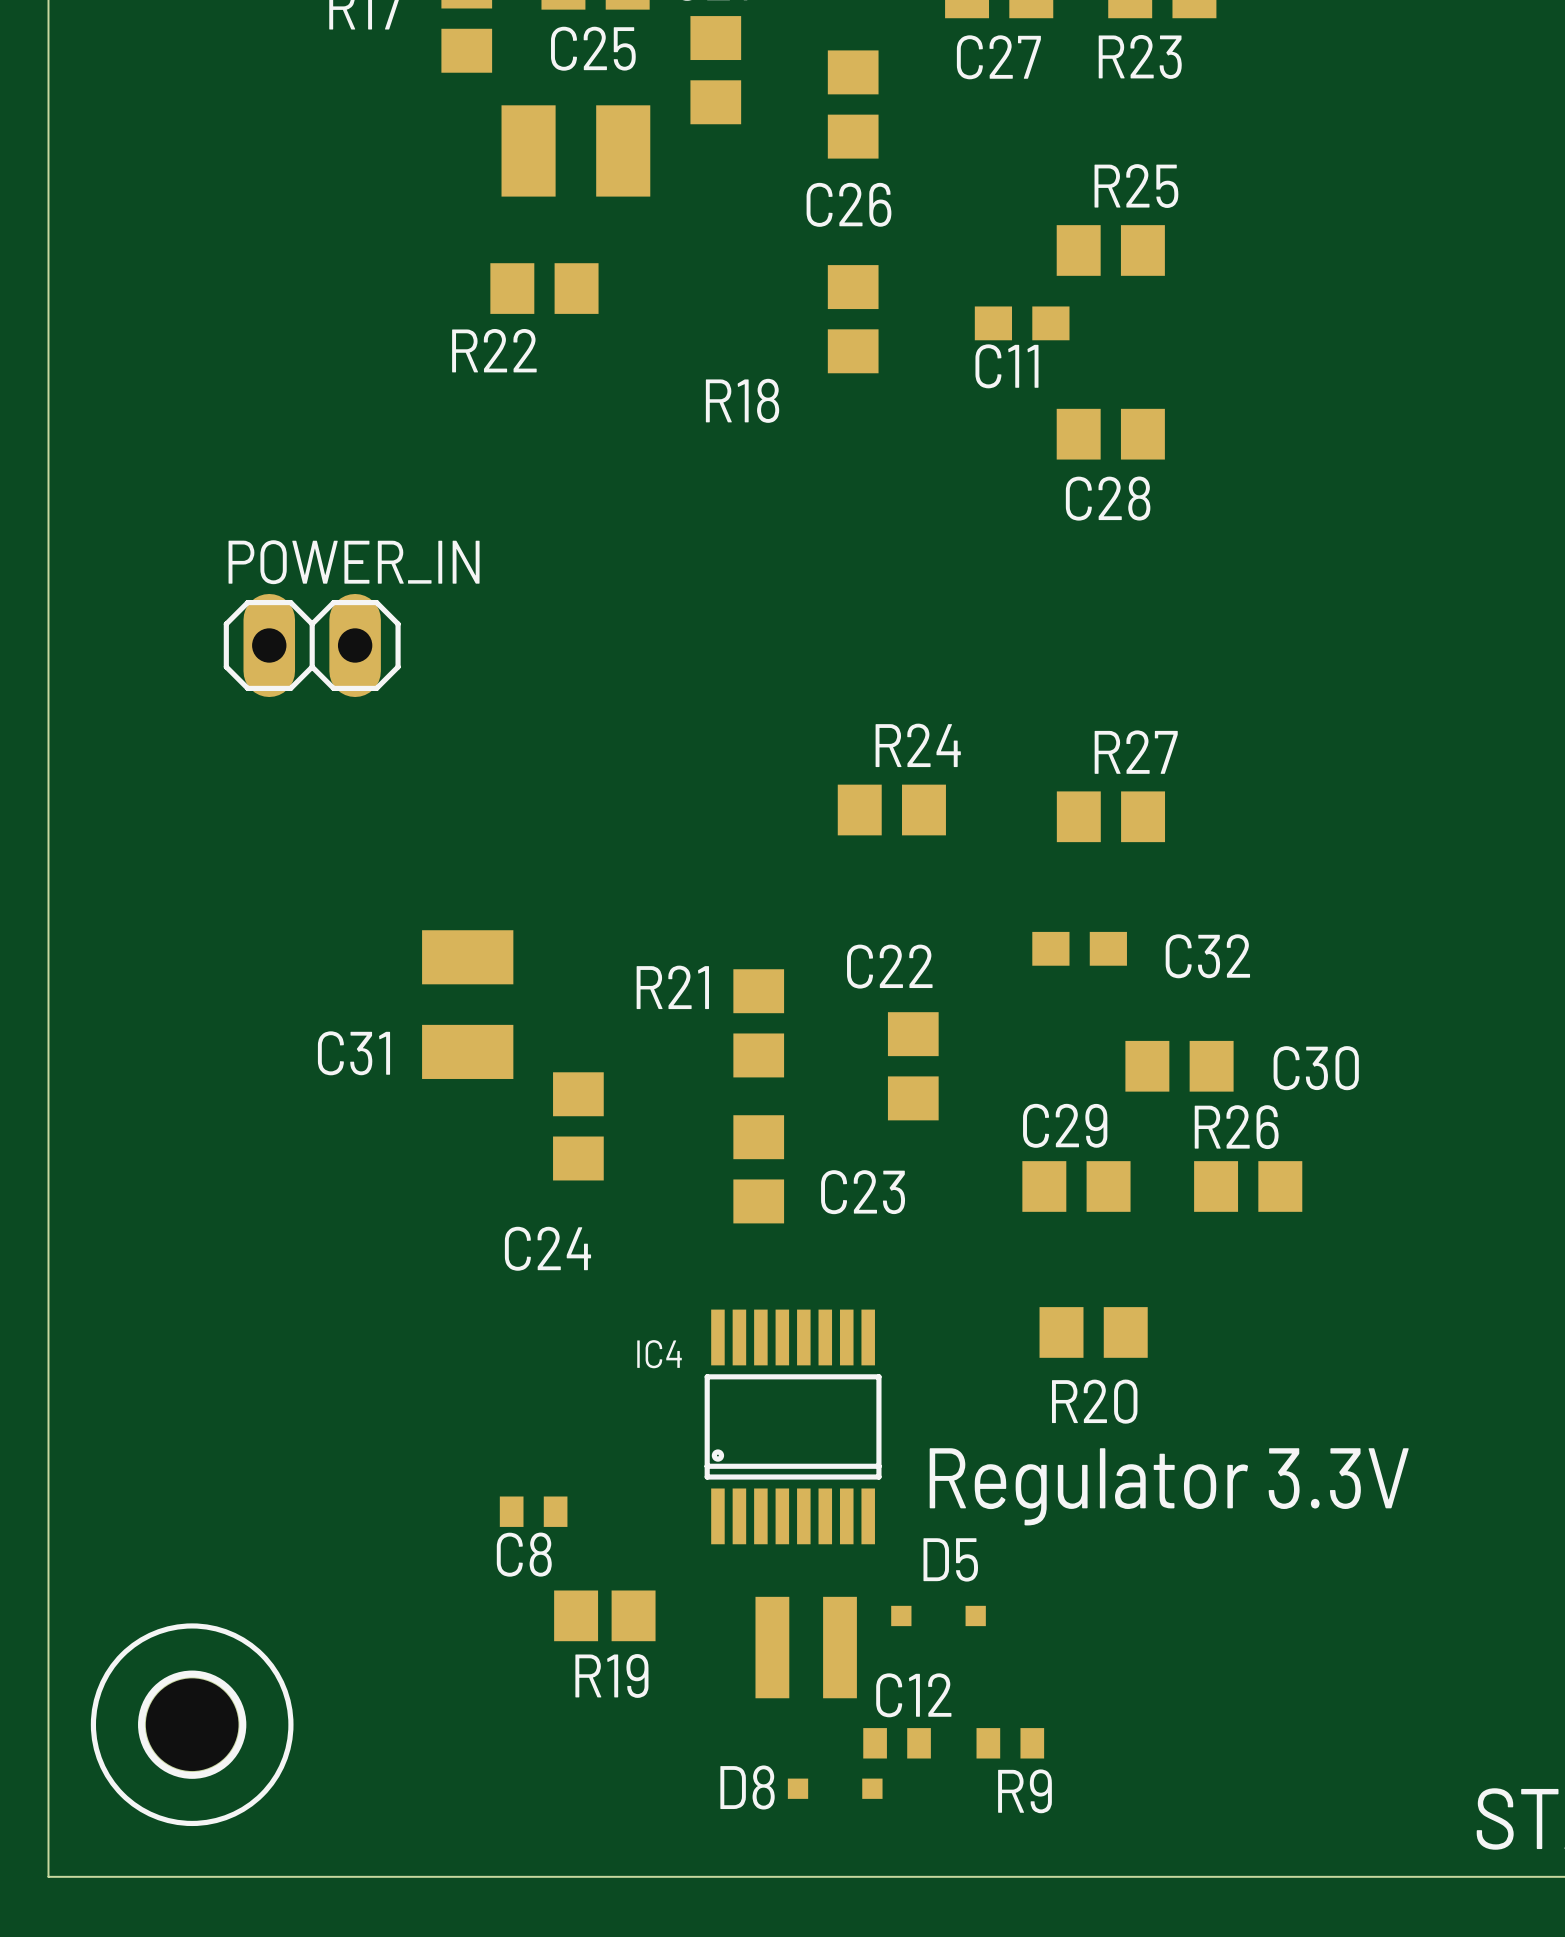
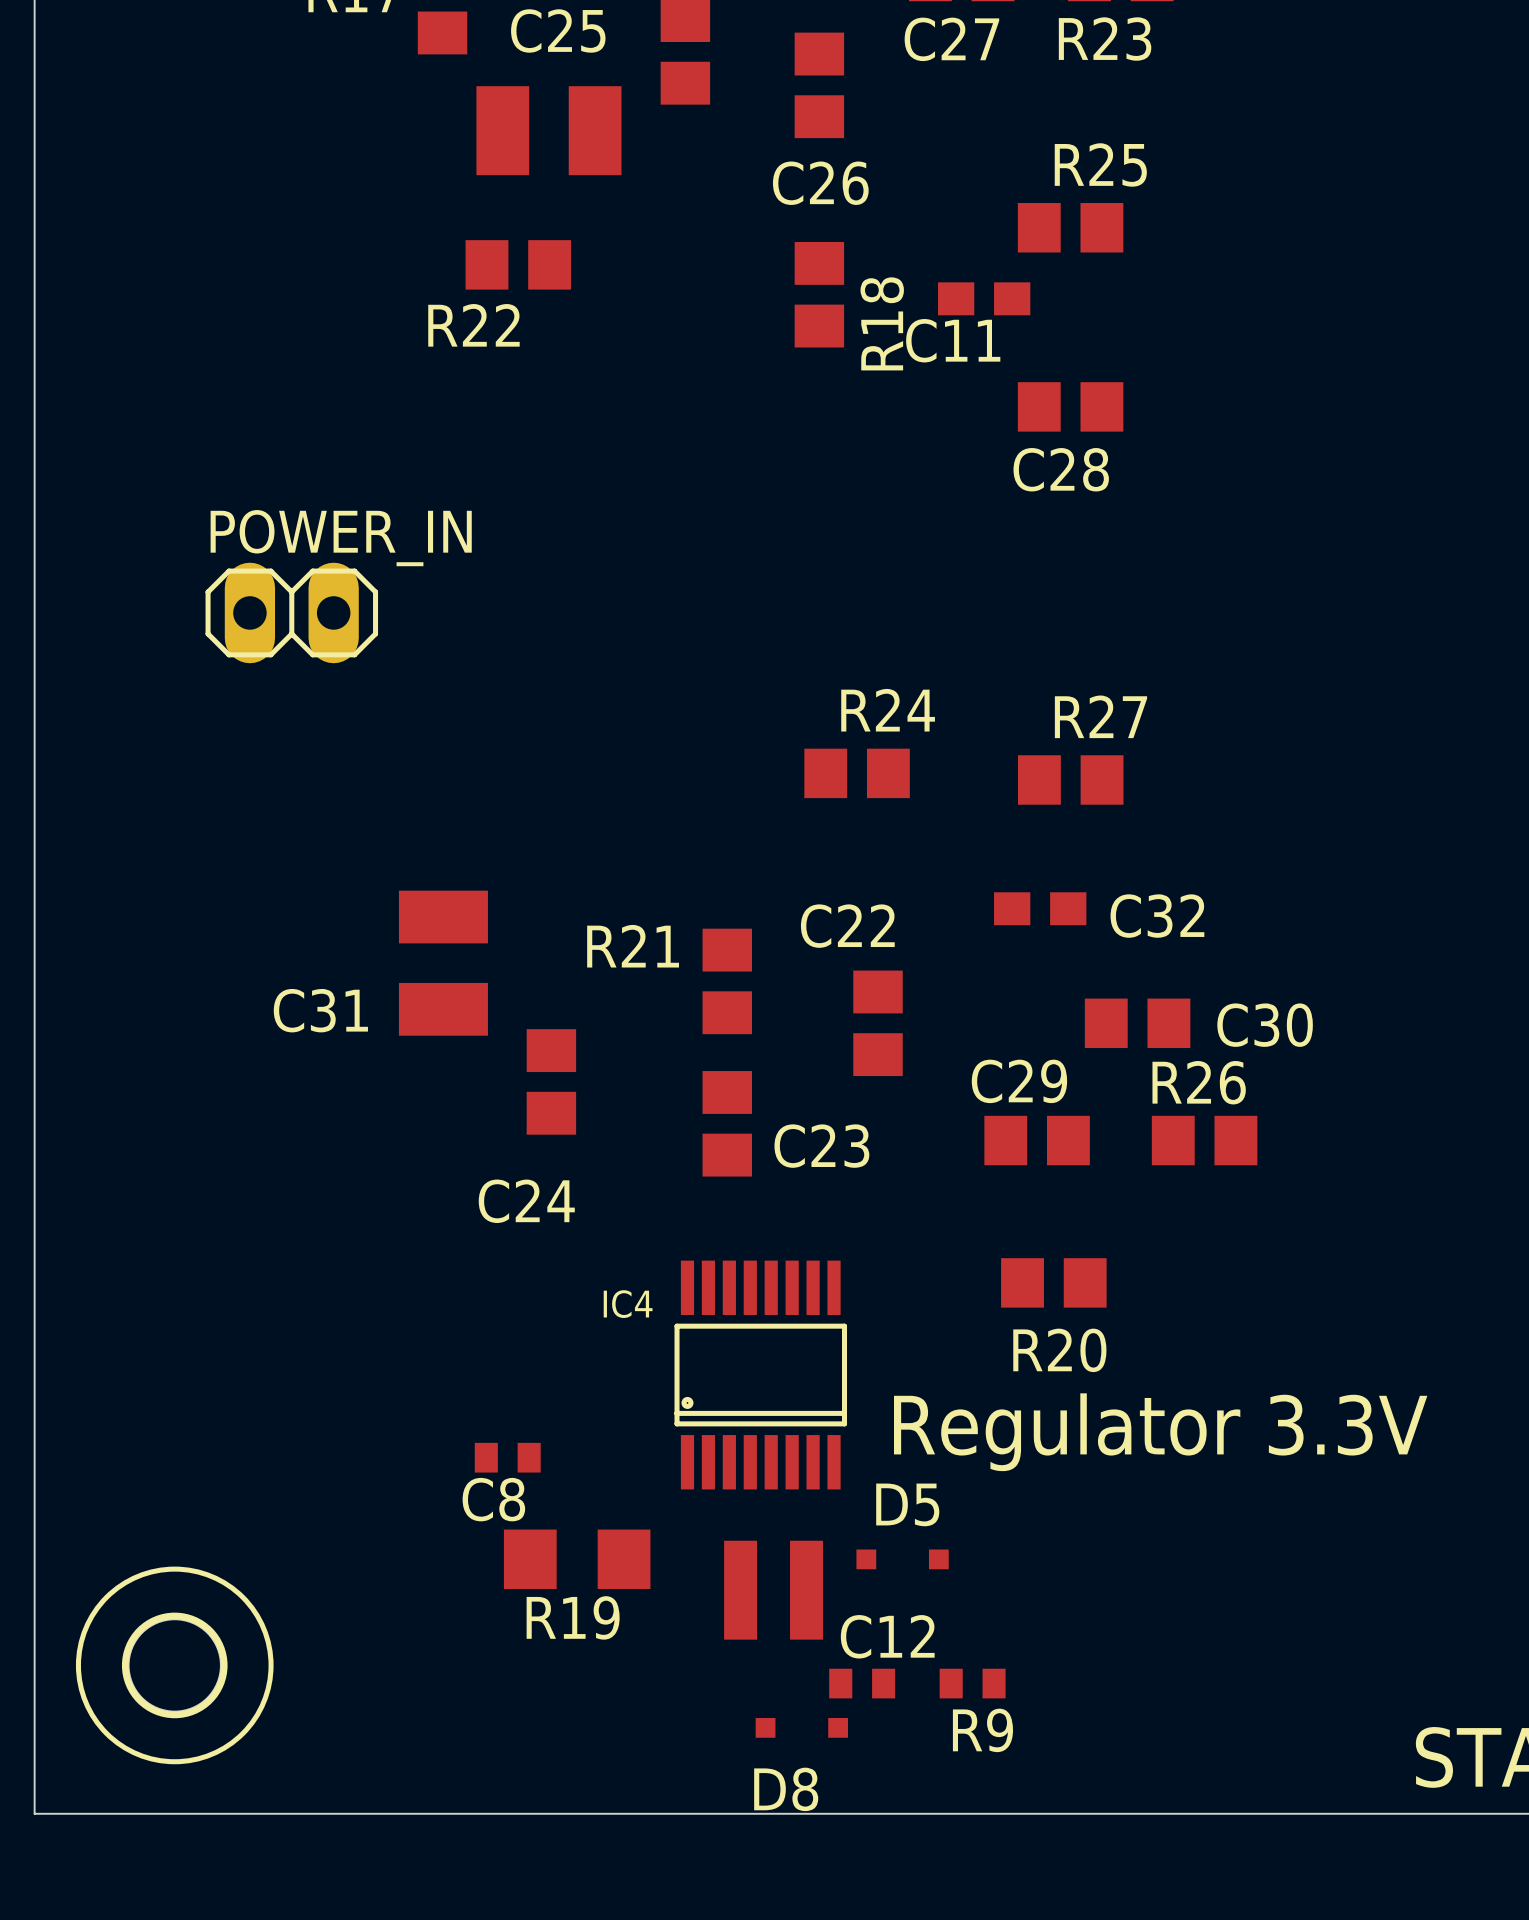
R18 name rotation: 0° (742, 400) -> 90° counterclockwise (882, 323)
R18 name position: R18 (742, 400) -> R18 (882, 323)
R19 footprint: [554, 1590, 656, 1642] -> [503, 1529, 651, 1589]
D8 name position: D8 (747, 1787) -> D8 (786, 1789)

